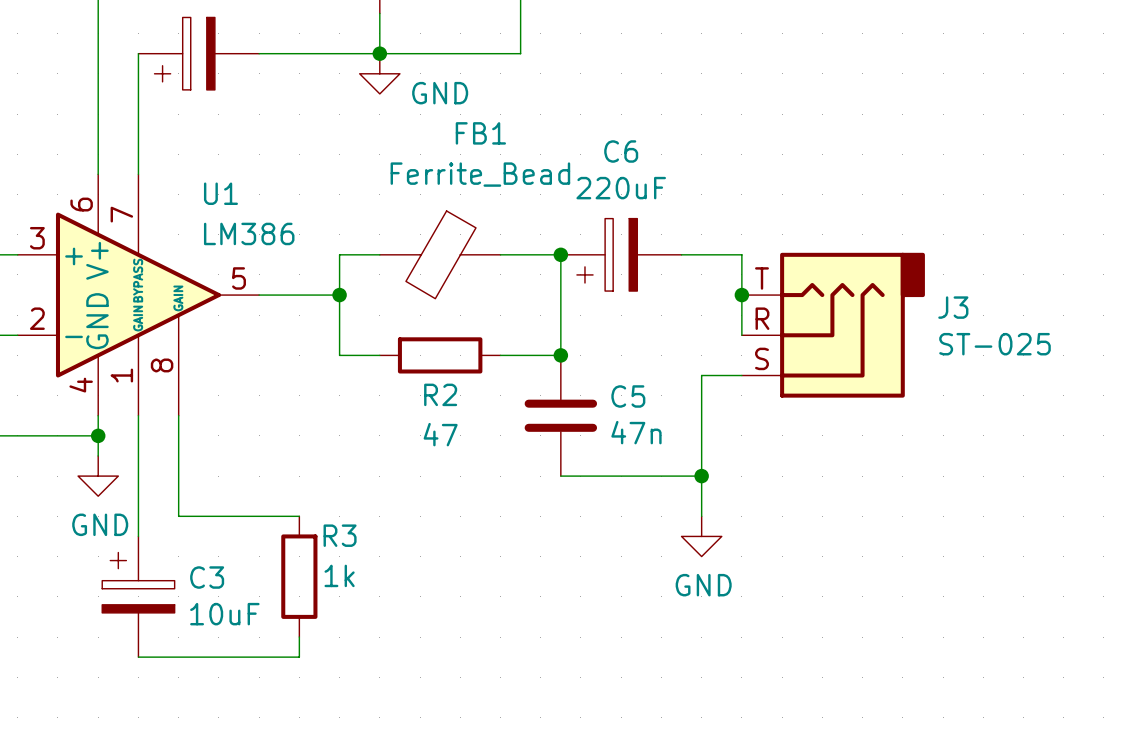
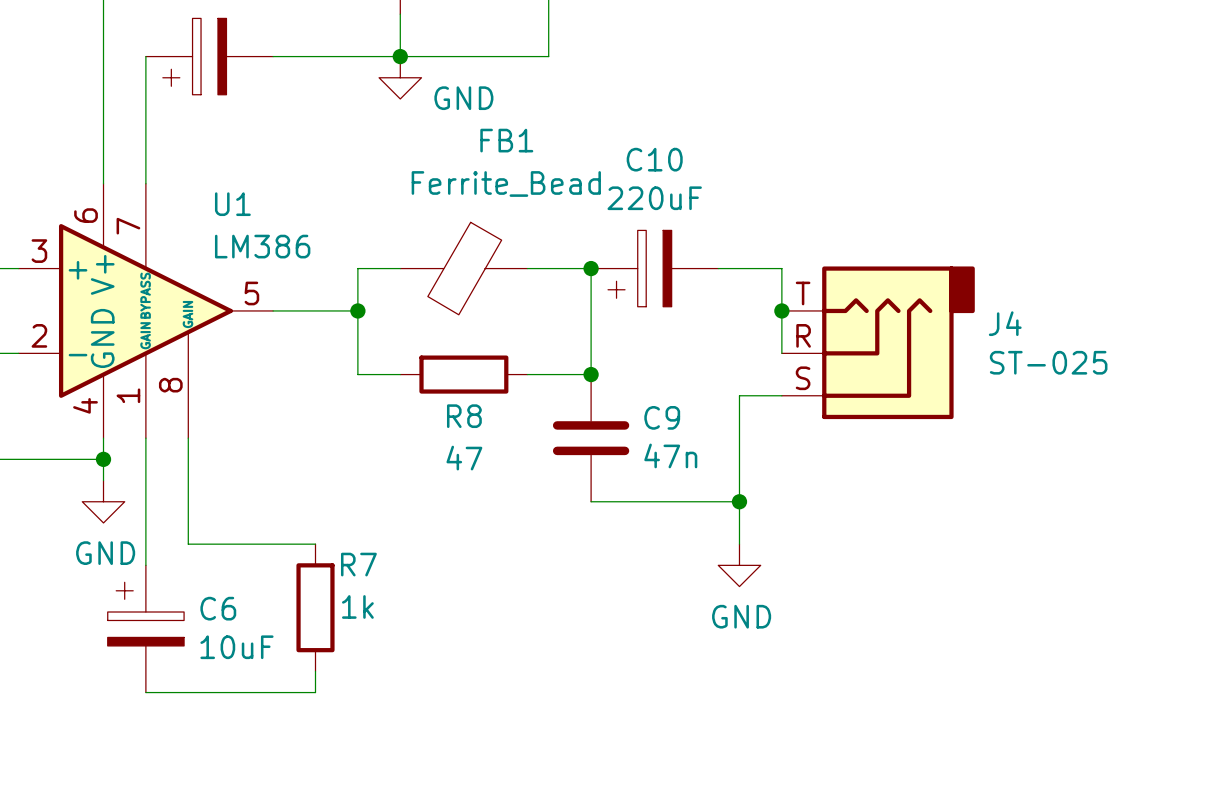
C6 name: C6 (621, 151) -> C10 (654, 159)
J3 name: J3 (953, 307) -> J4 (1005, 323)
R2 name: R2 (440, 394) -> R8 (464, 416)
C5 name: C5 (628, 396) -> C9 (662, 417)
R3 name: R3 (340, 535) -> R7 (358, 564)
C3 name: C3 (207, 577) -> C6 (218, 608)

